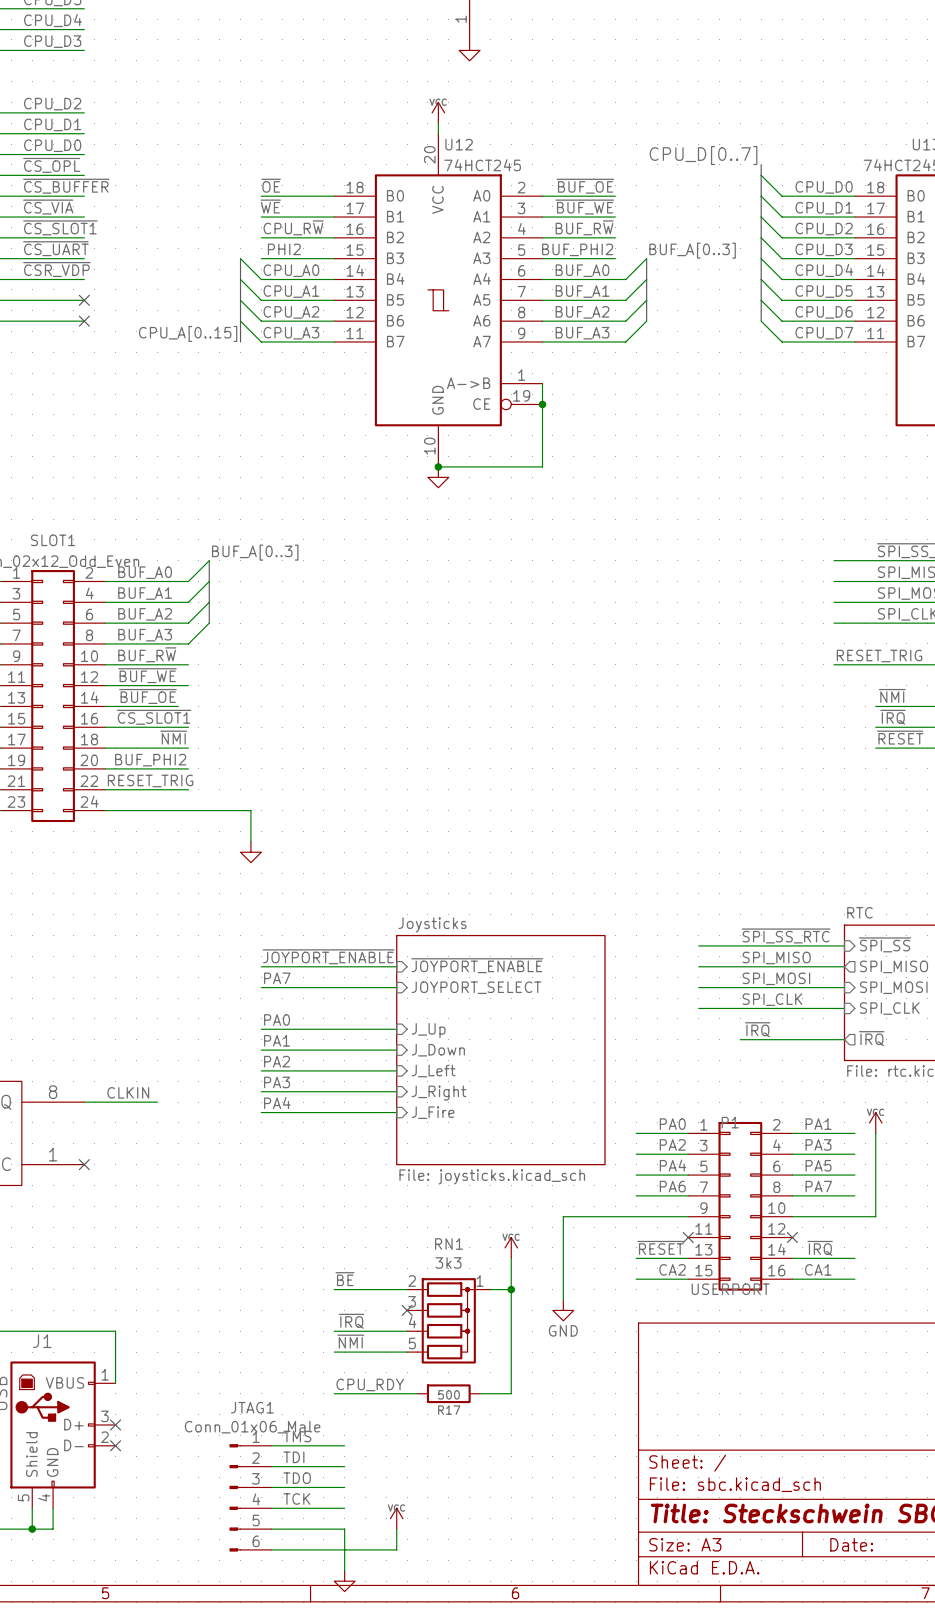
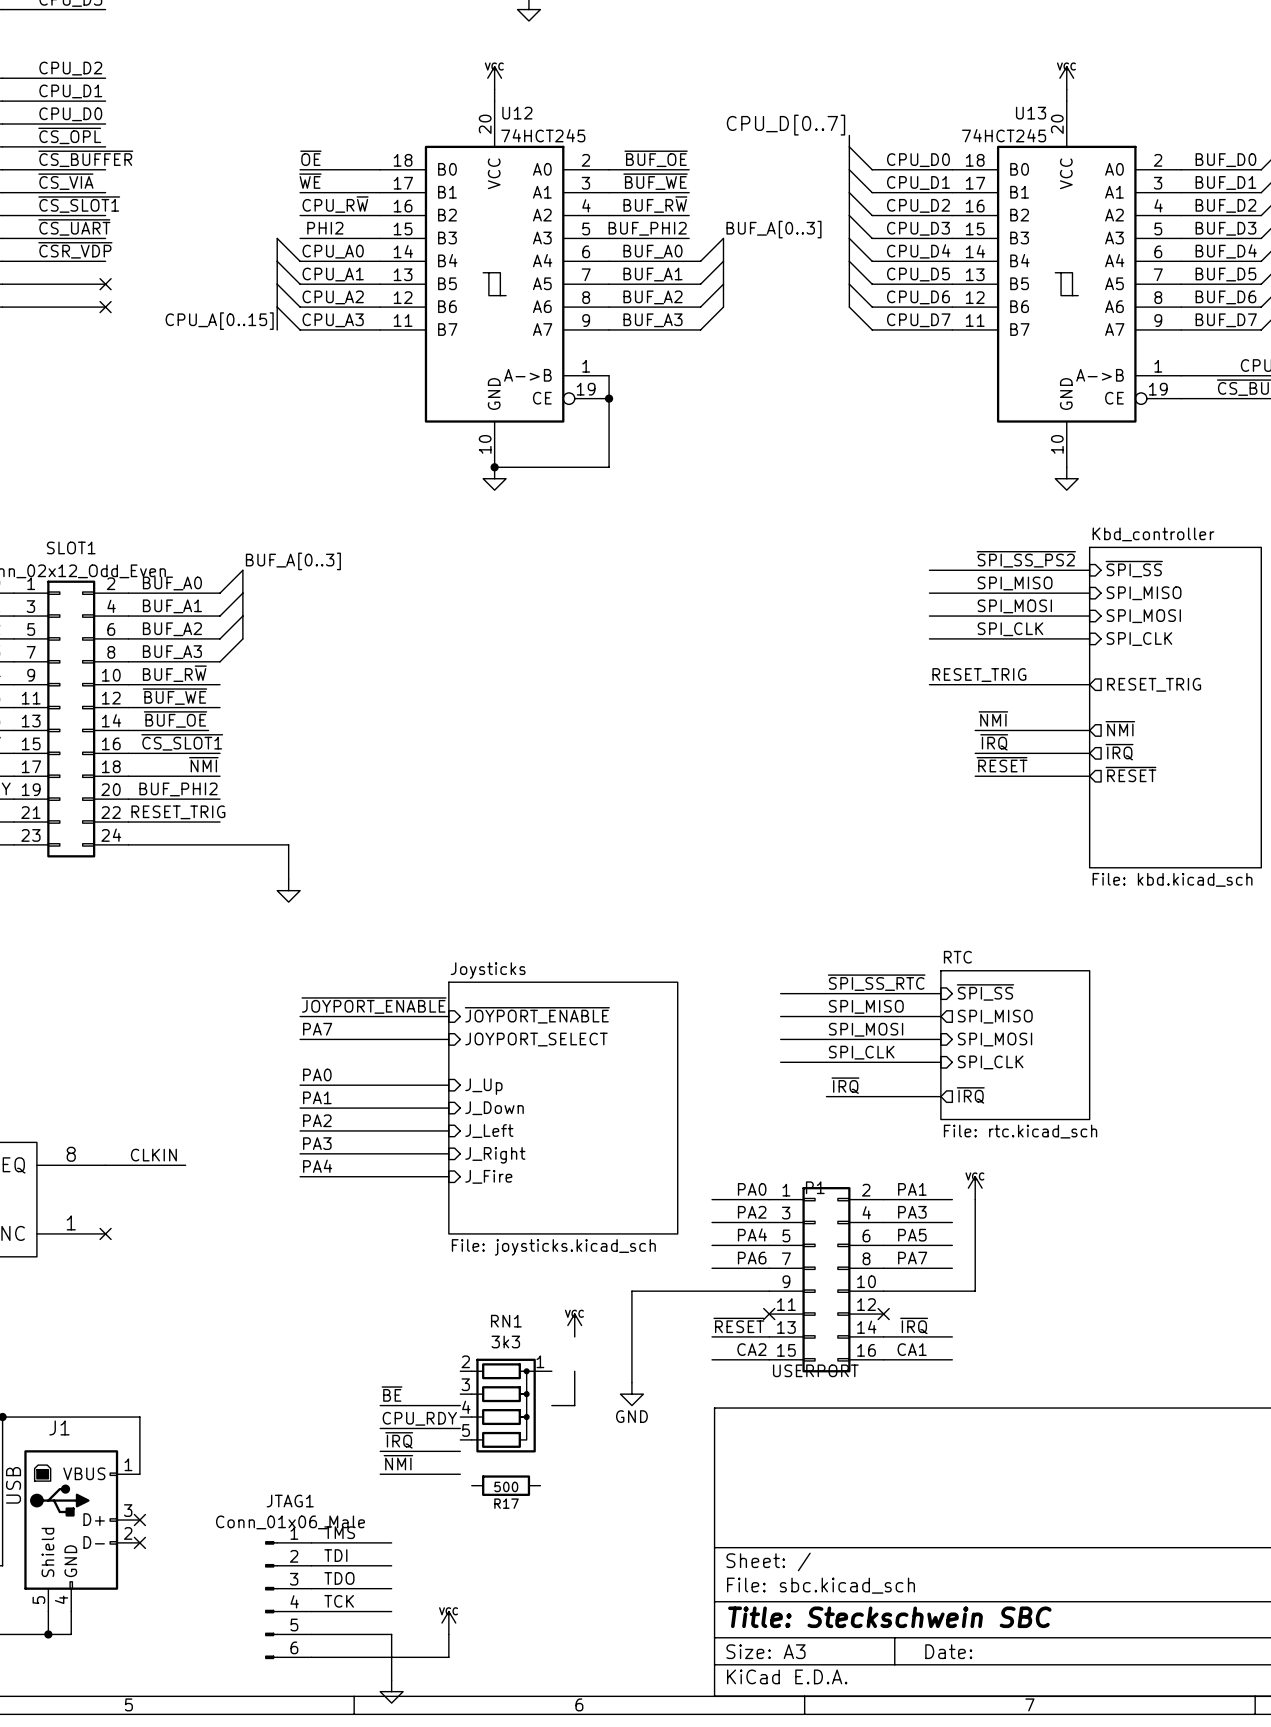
wire: (511, 1258) (511, 1289) (490, 1289) -> none
label position: ~{BE} (344, 1279) -> ~{BE} (392, 1394)
wire: (334, 1289) (407, 1289) -> (380, 1405) (460, 1405)
junction: (511, 1289) -> none
no-connect mark: (407, 1310) -> none
wire: (511, 1320) (511, 1393) (480, 1393) -> (574, 1405) (551, 1405)
label position: ~{IRQ} (351, 1321) -> ~{IRQ} (399, 1440)
wire: (334, 1331) (407, 1331) -> (380, 1451) (460, 1451)
wire: none -> (380, 1428) (460, 1428)
label position: ~{NMI} (350, 1341) -> ~{NMI} (398, 1462)
wire: (334, 1352) (407, 1352) -> (380, 1474) (460, 1474)
label position: CPU_RDY (370, 1384) -> CPU_RDY (419, 1418)
wire: (334, 1393) (417, 1393) -> none

